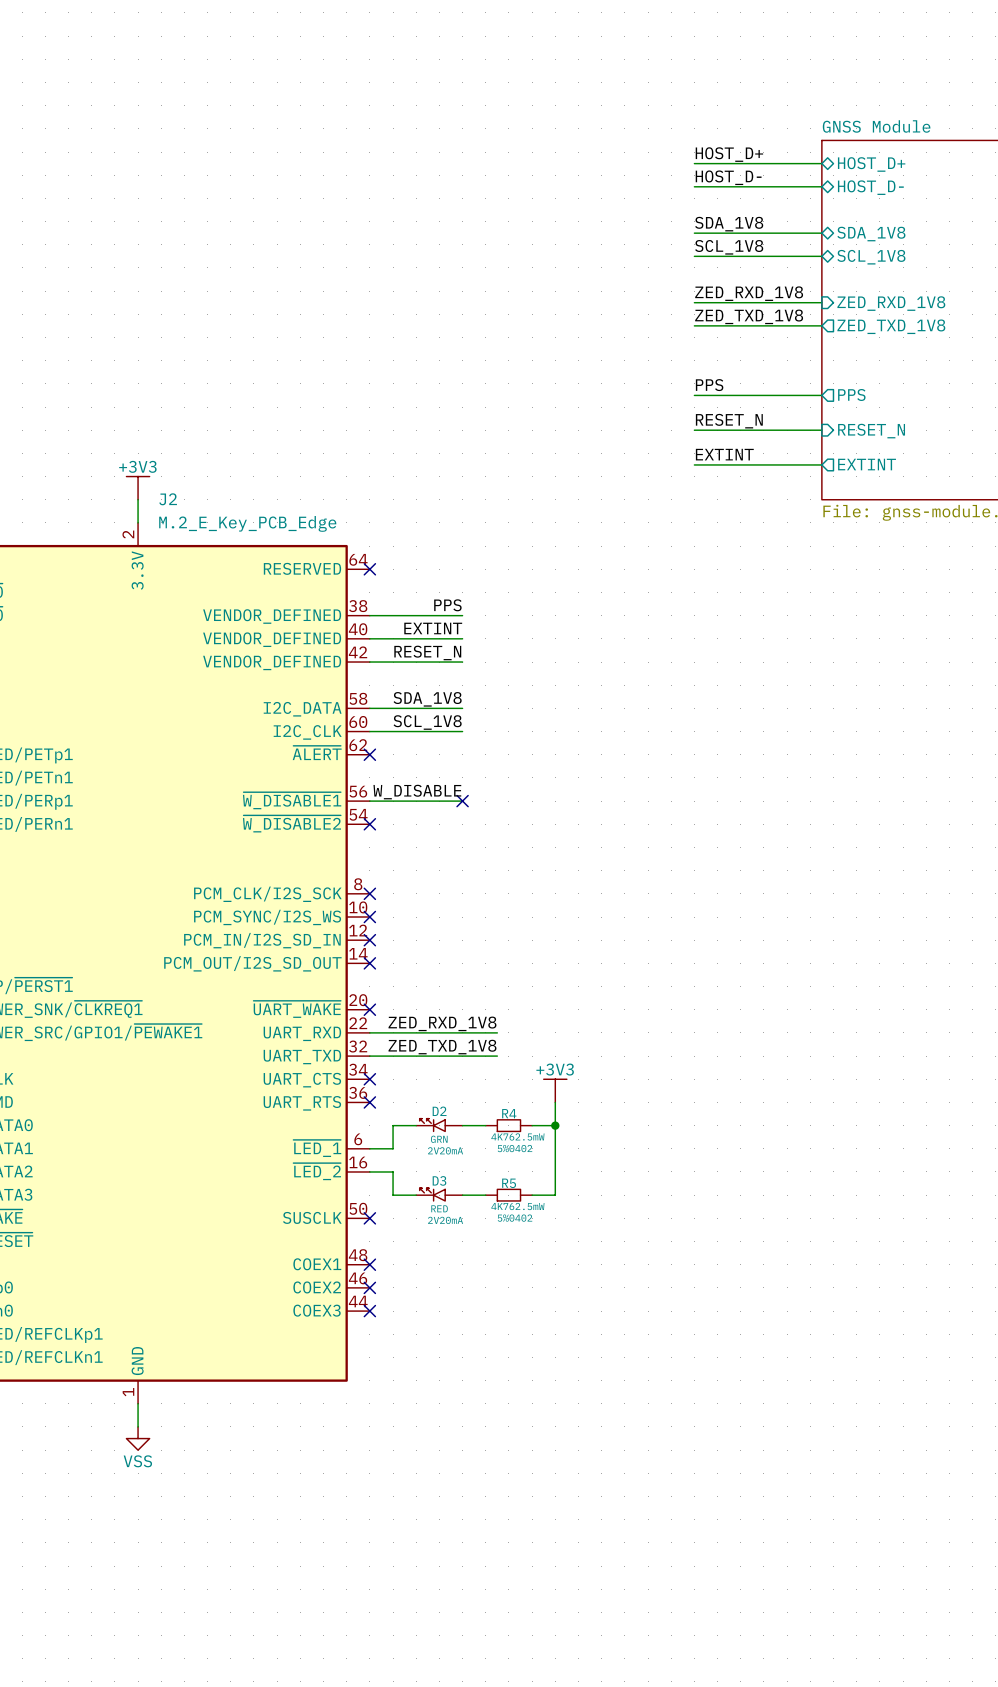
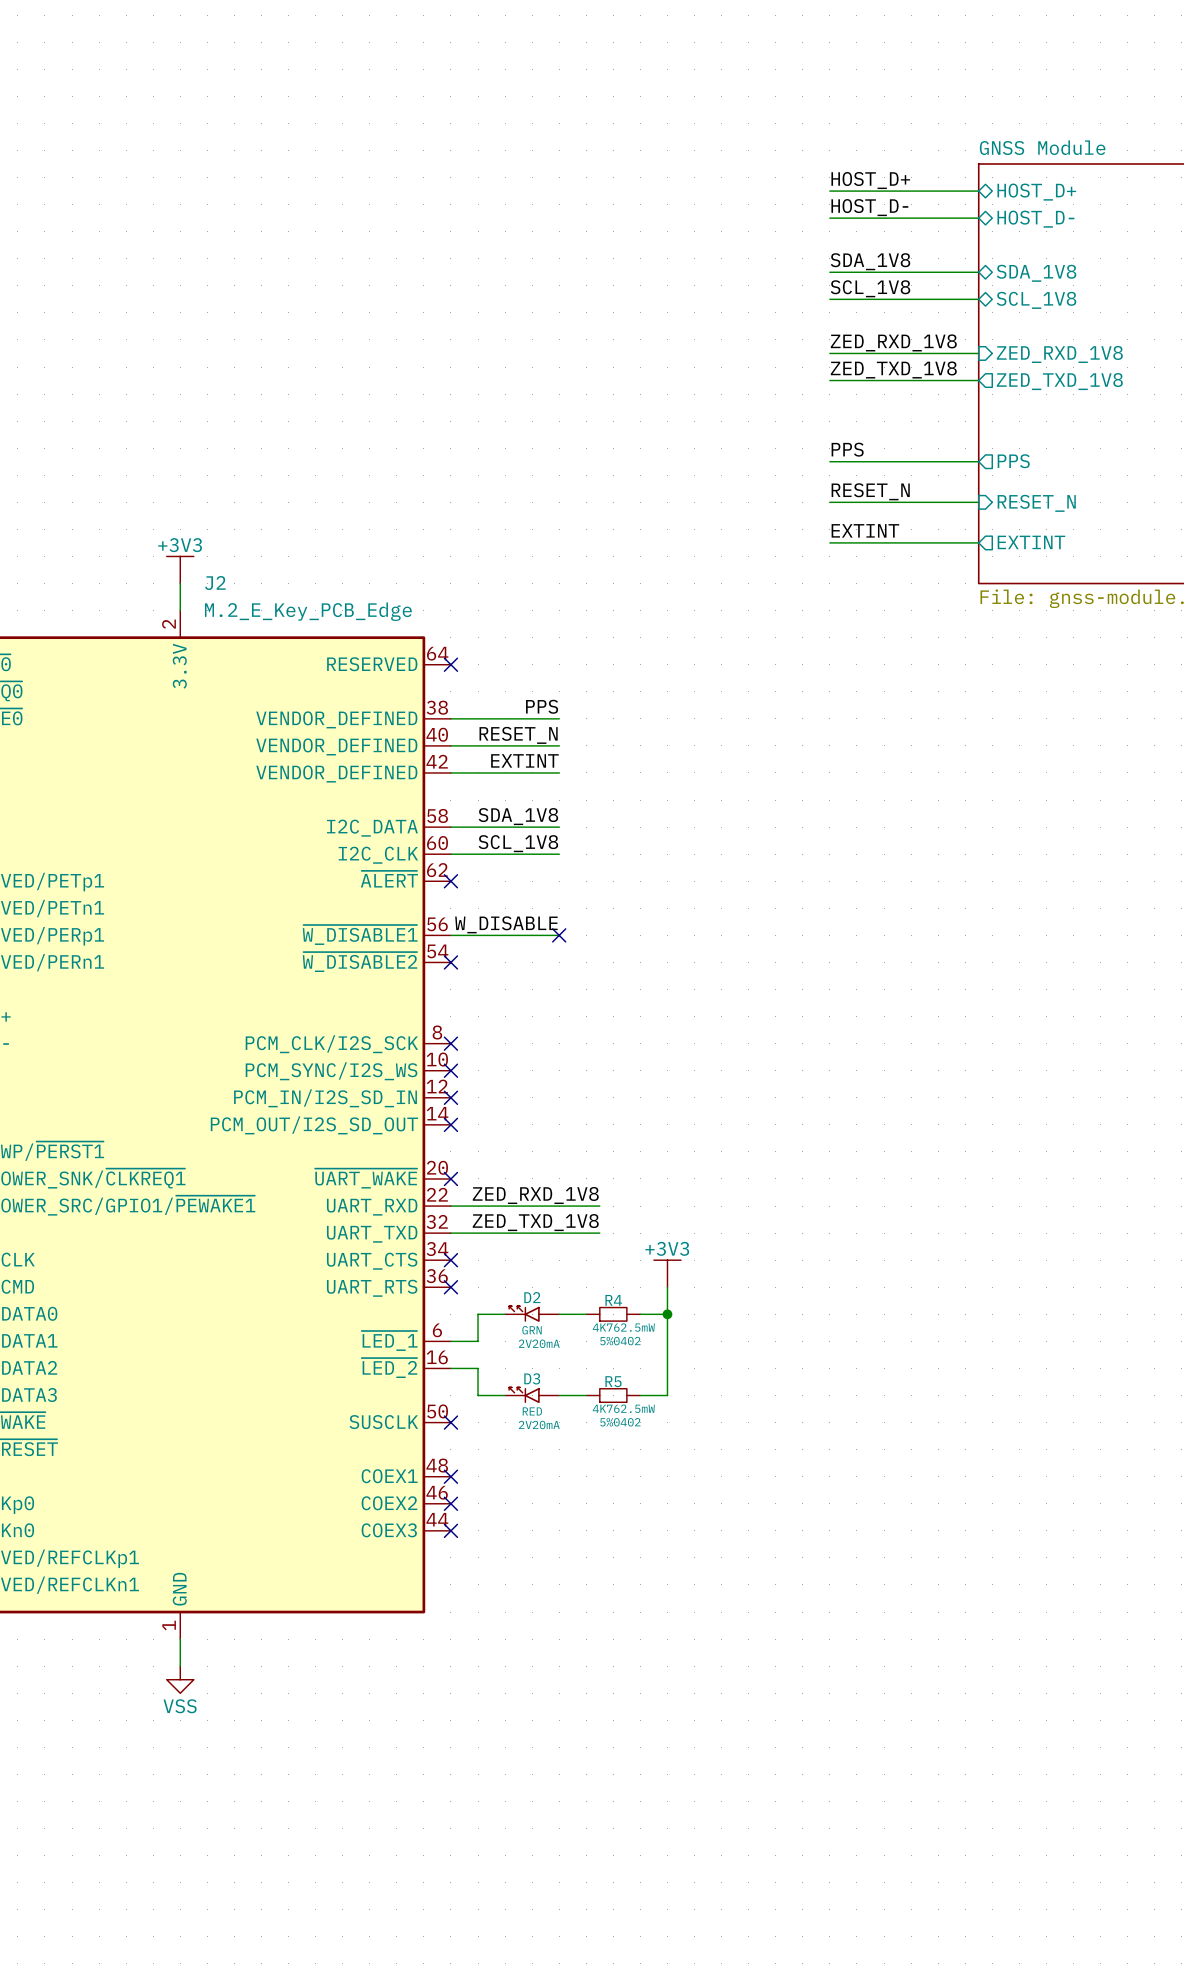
label: EXTINT (433, 628) -> RESET_N (518, 735)
label: RESET_N (427, 652) -> EXTINT (524, 760)

